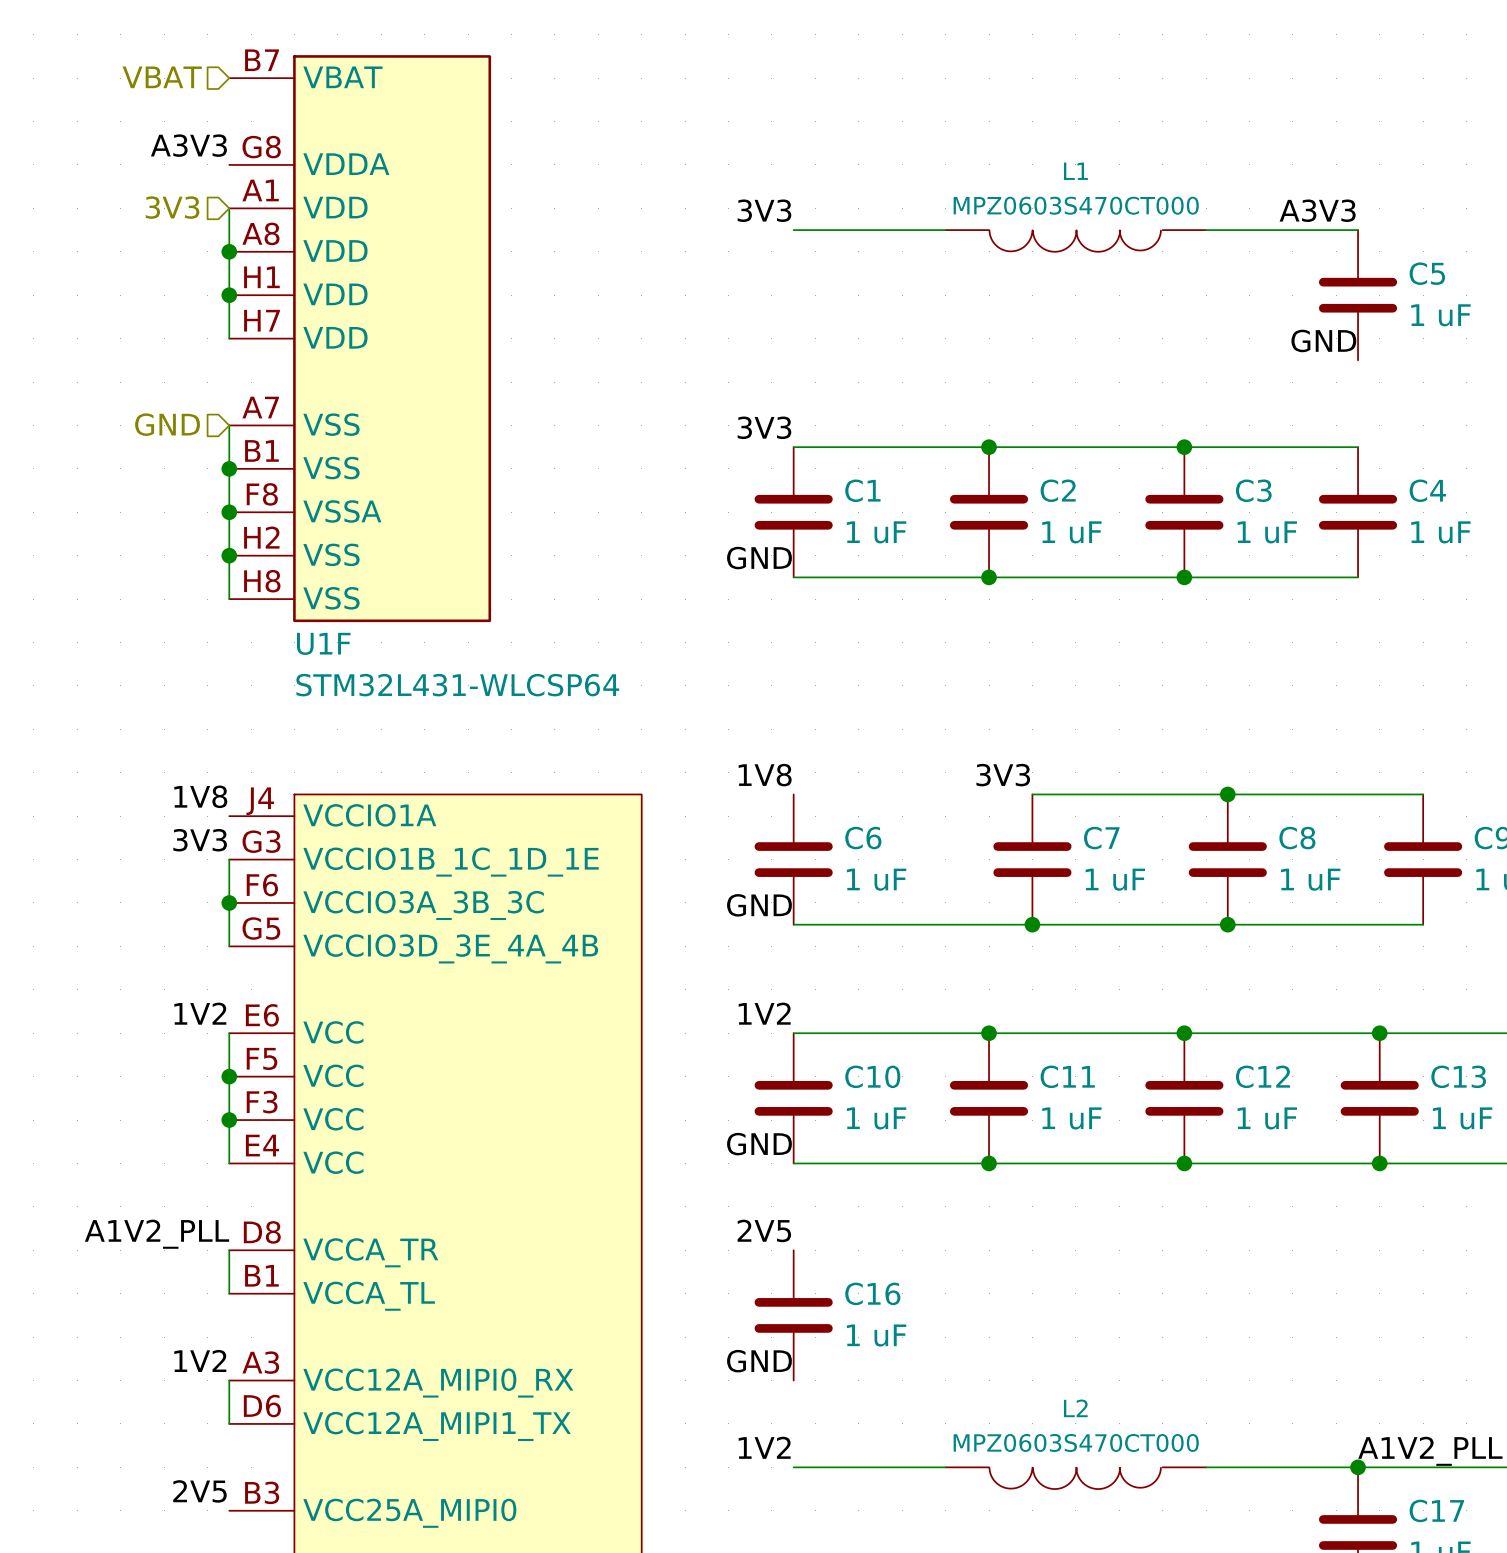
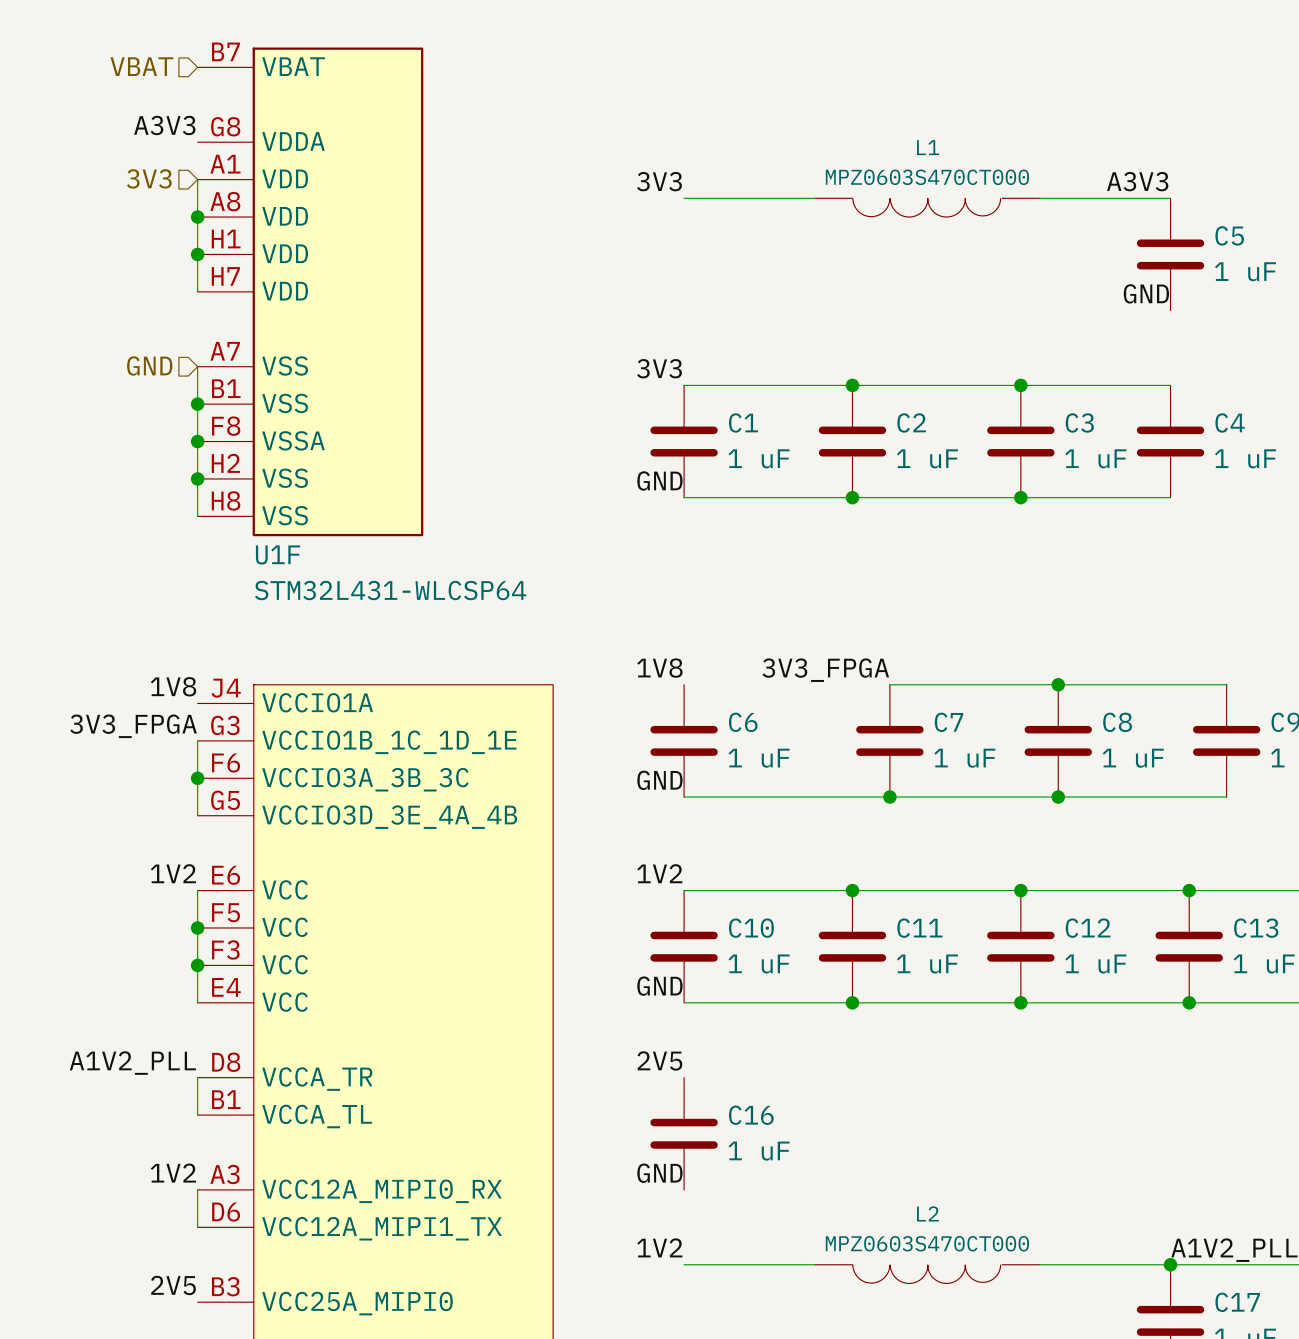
label: 3V3 (1003, 775) -> 3V3_FPGA (825, 670)
label: 3V3 (200, 840) -> 3V3_FPGA (133, 726)

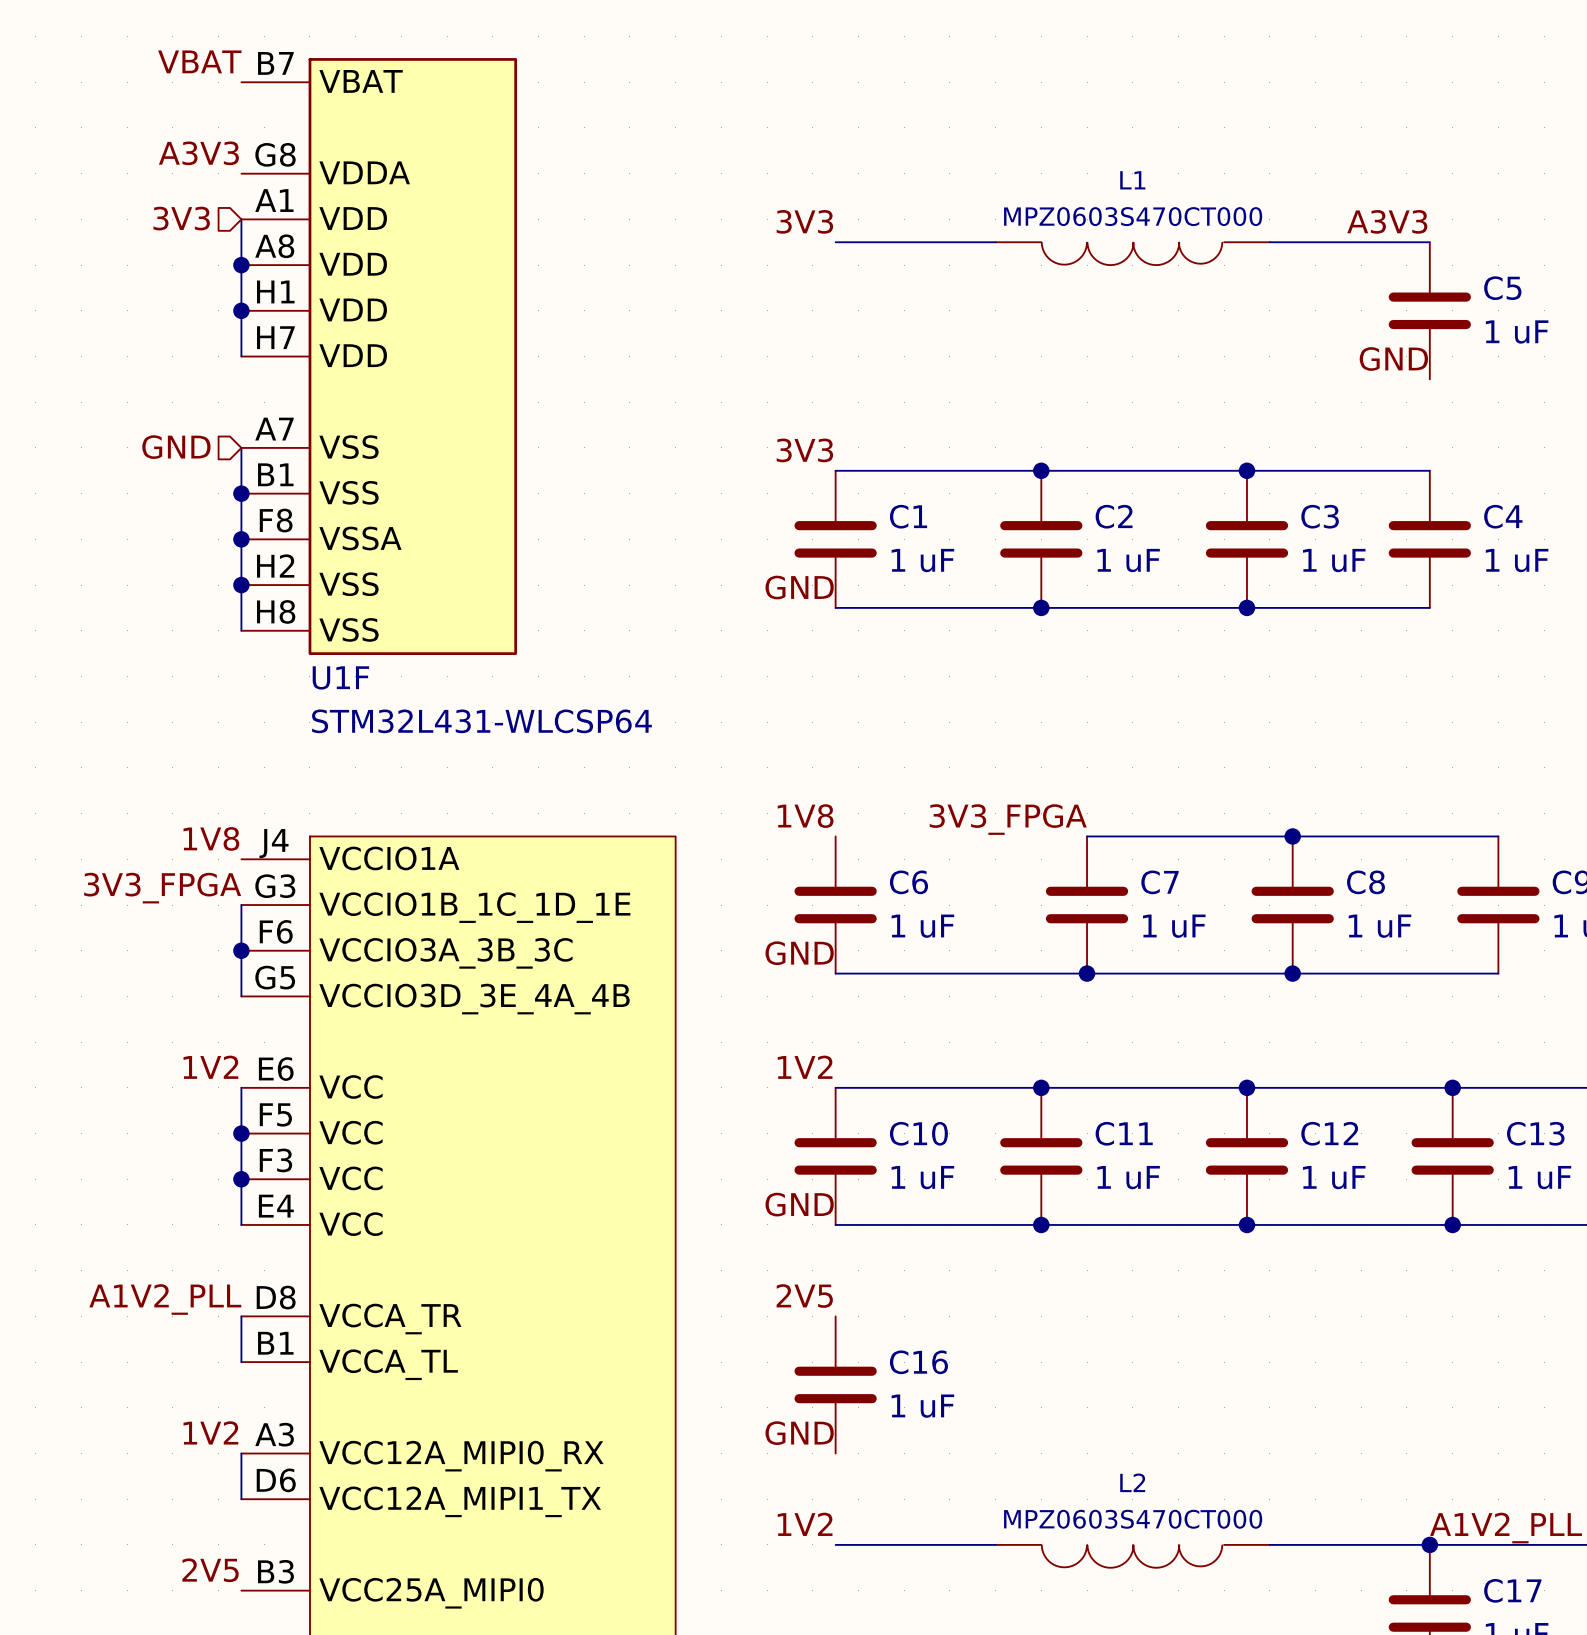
label: none -> VBAT (199, 61)
hierarchical label: VBAT (141, 66) -> none

